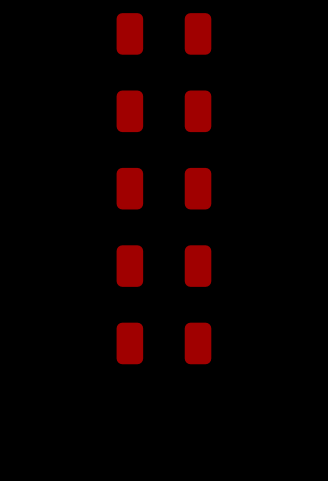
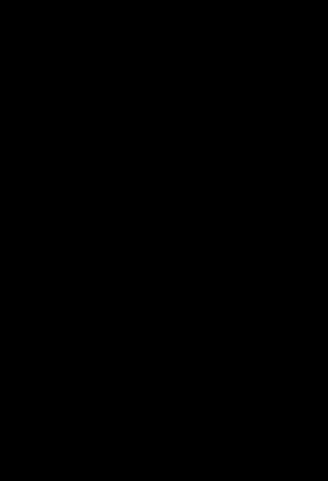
part: (163, 33) -> none
part: (163, 111) -> none
part: (163, 188) -> none
part: (163, 266) -> none
part: (163, 343) -> none

